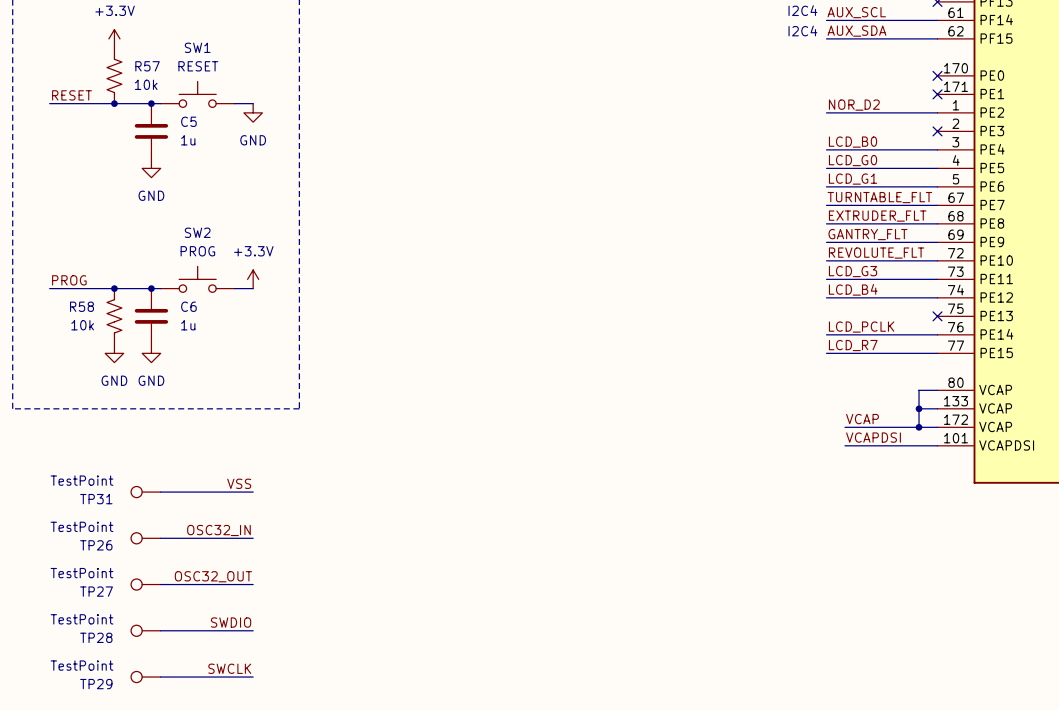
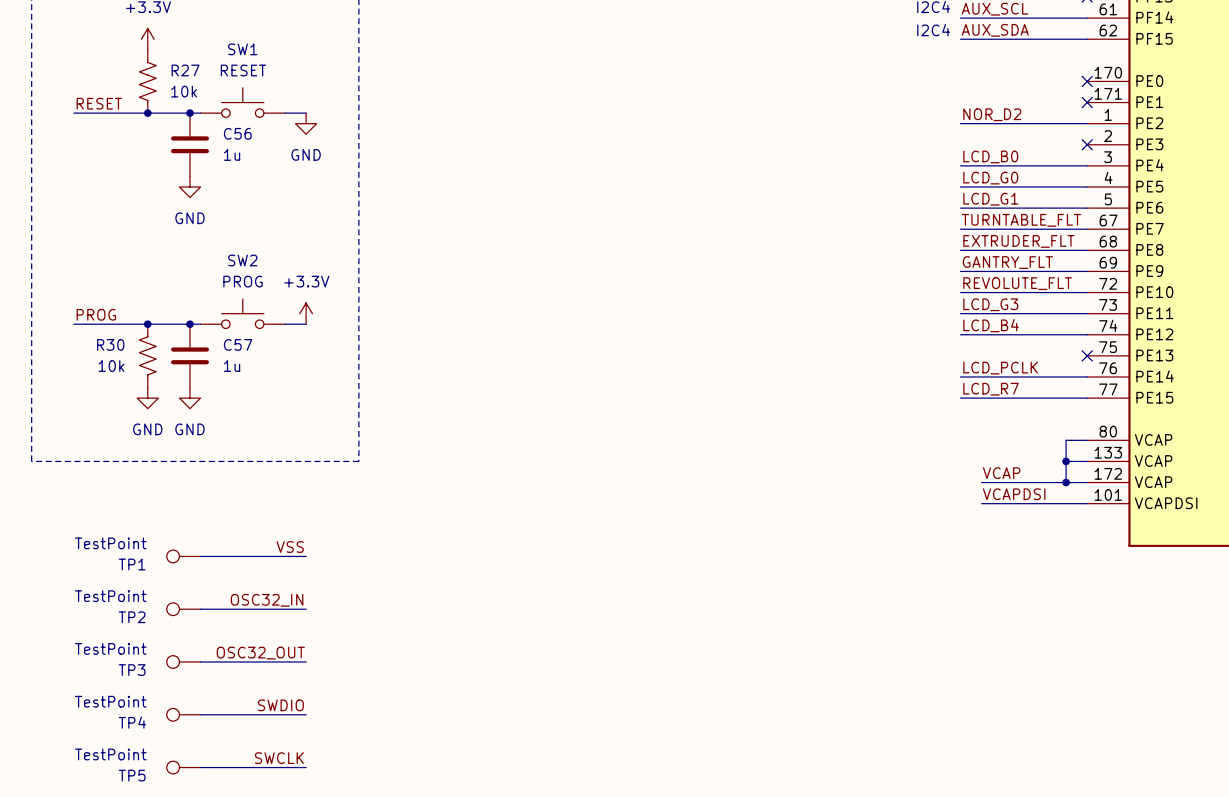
R57 name: R57 (147, 66) -> R27 (185, 70)
C5 name: C5 (188, 121) -> C56 (237, 133)
R58 name: R58 (82, 306) -> R30 (110, 344)
C6 name: C6 (188, 306) -> C57 (238, 344)
TP31 name: TP31 (96, 499) -> TP1 (132, 564)
TP26 name: TP26 (96, 545) -> TP2 (132, 617)
TP27 name: TP27 (96, 591) -> TP3 (132, 670)
TP28 name: TP28 (96, 637) -> TP4 (132, 722)
TP29 name: TP29 (96, 684) -> TP5 (132, 775)

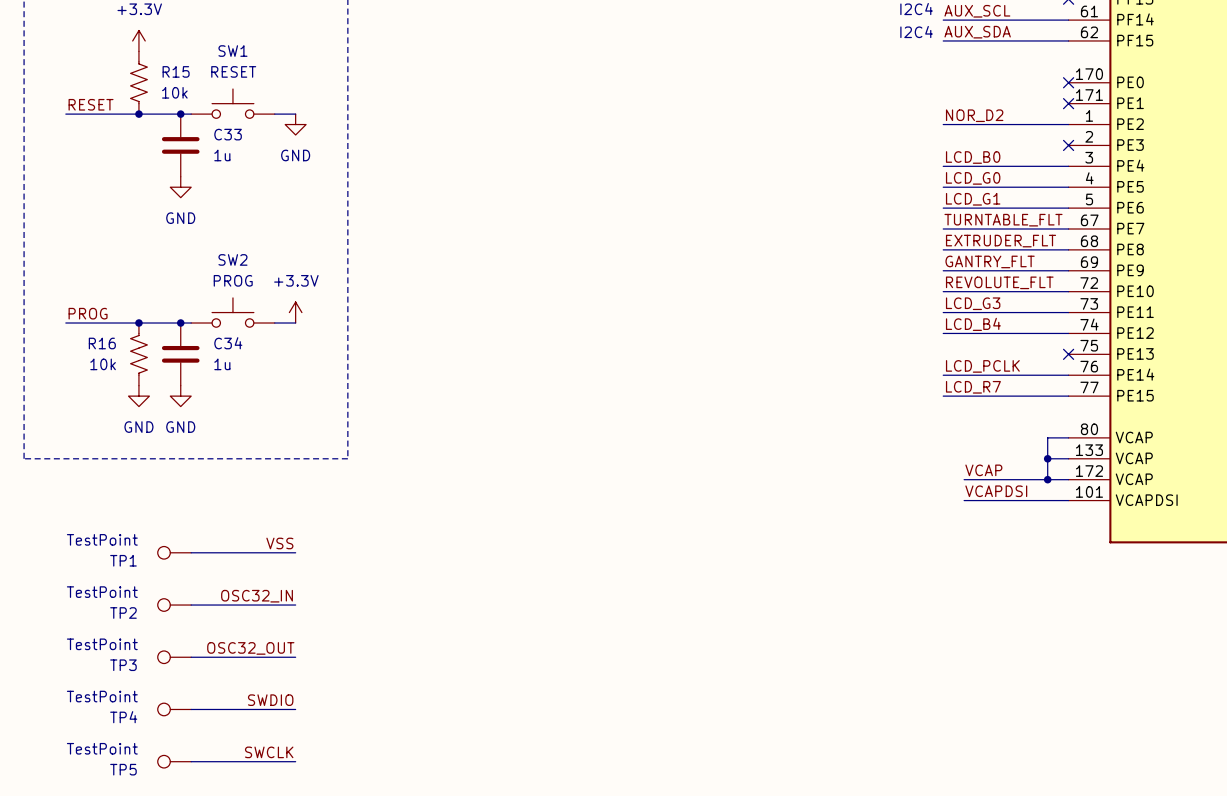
R27 name: R27 (185, 70) -> R15 (176, 71)
C56 name: C56 (237, 133) -> C33 (228, 134)
R30 name: R30 (110, 344) -> R16 (102, 343)
C57 name: C57 (238, 344) -> C34 (228, 343)

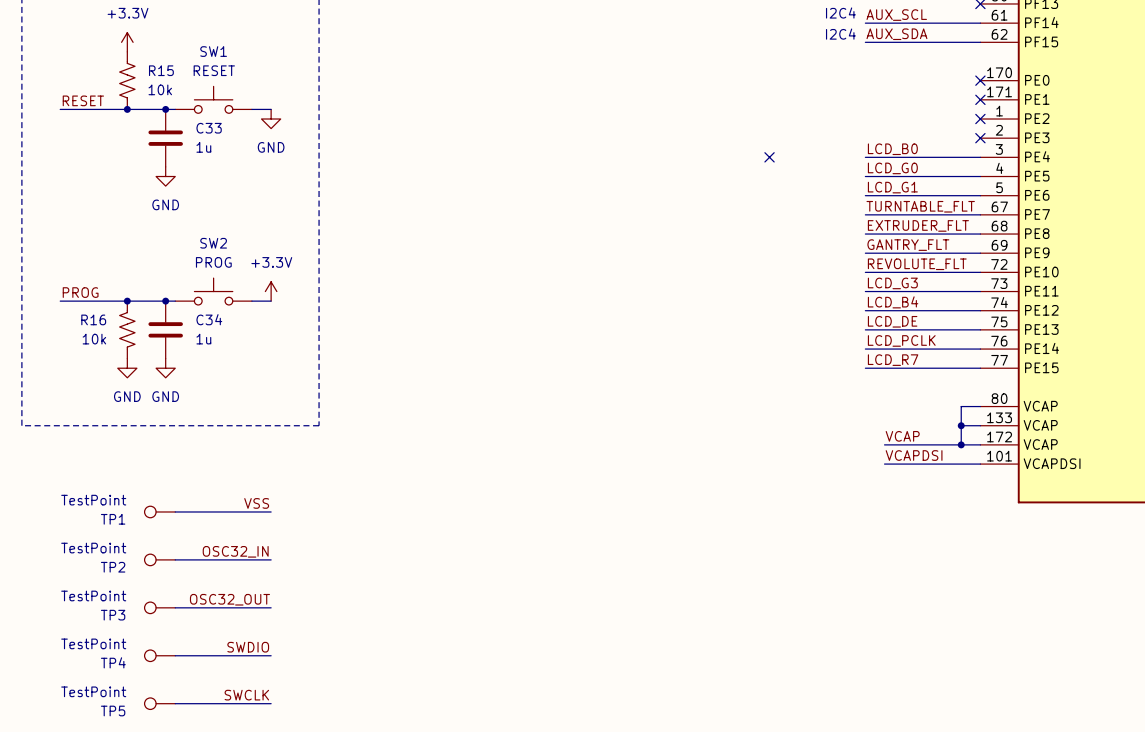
label: NOR_D2 (974, 115) -> none
wire: (943, 124) (1068, 124) -> none
no-connect mark: none -> (980, 119)
no-connect mark: none -> (769, 157)
label: none -> LCD_DE (892, 321)
wire: none -> (865, 329) (980, 329)
no-connect mark: (1068, 354) -> none

